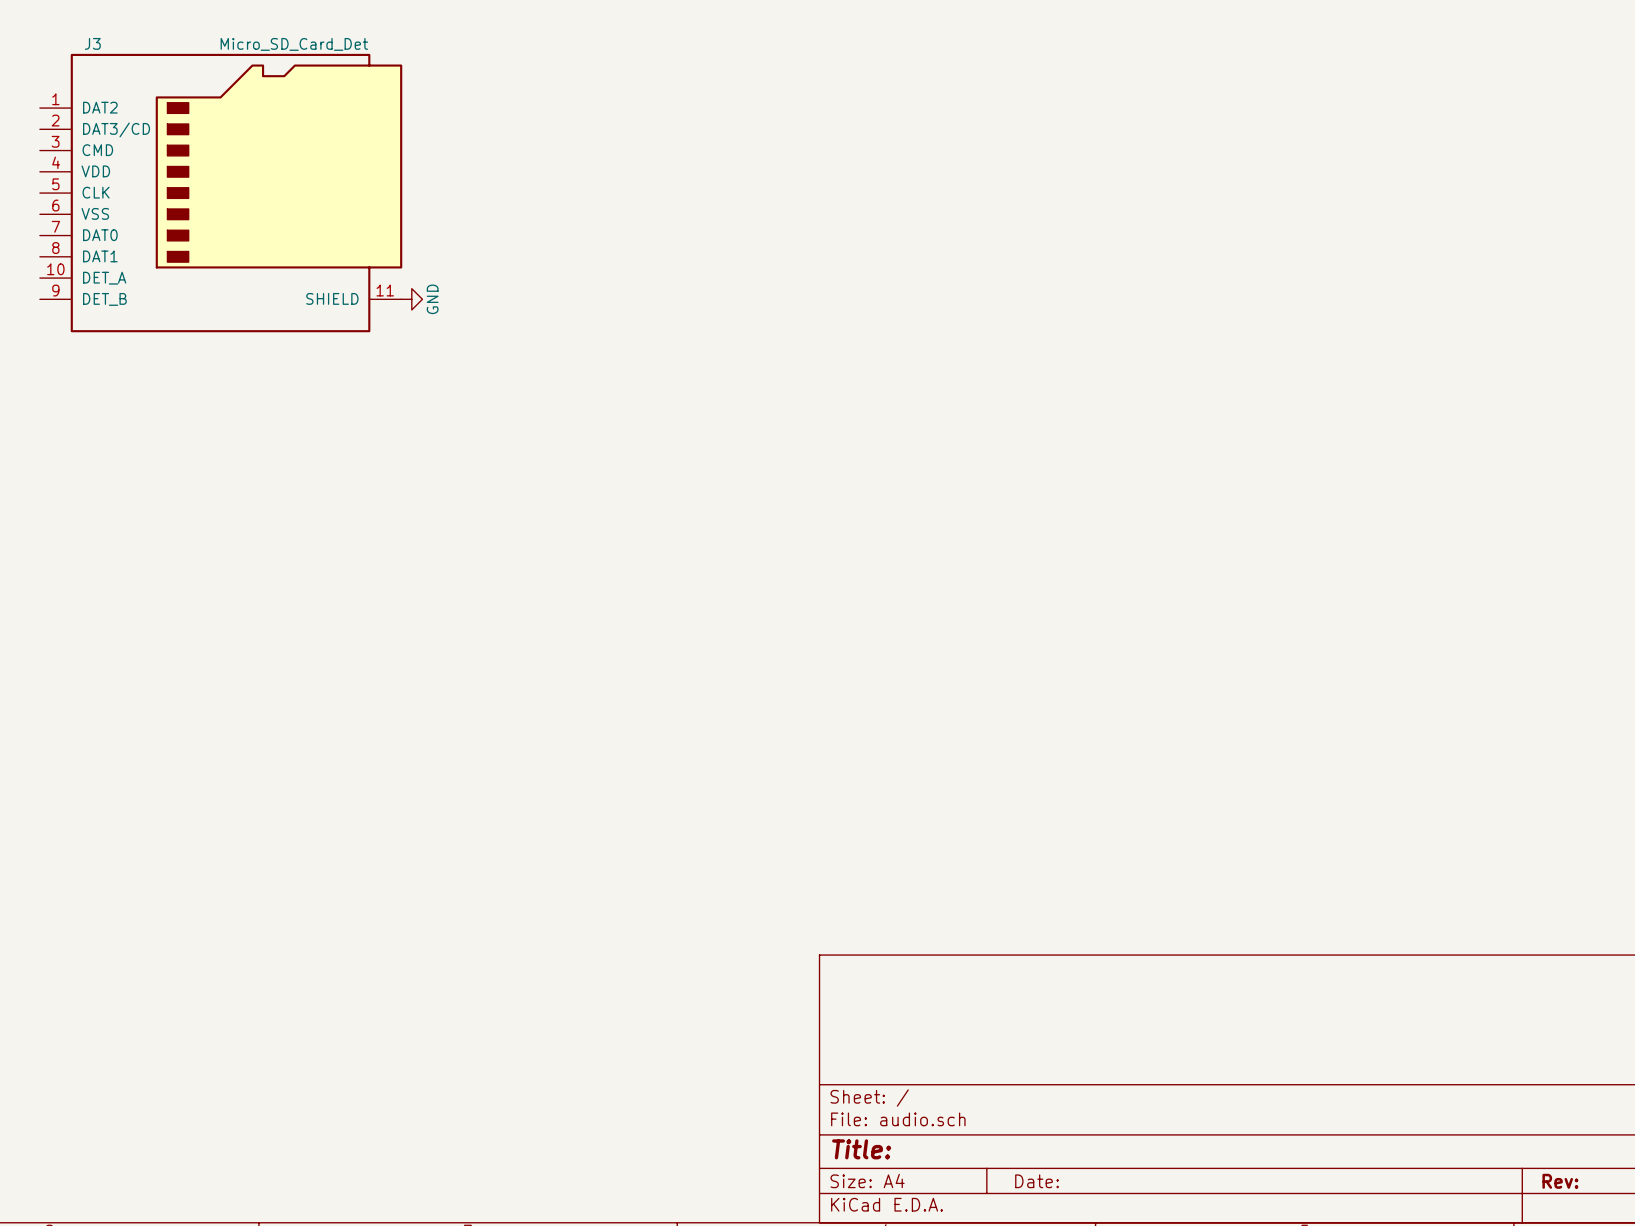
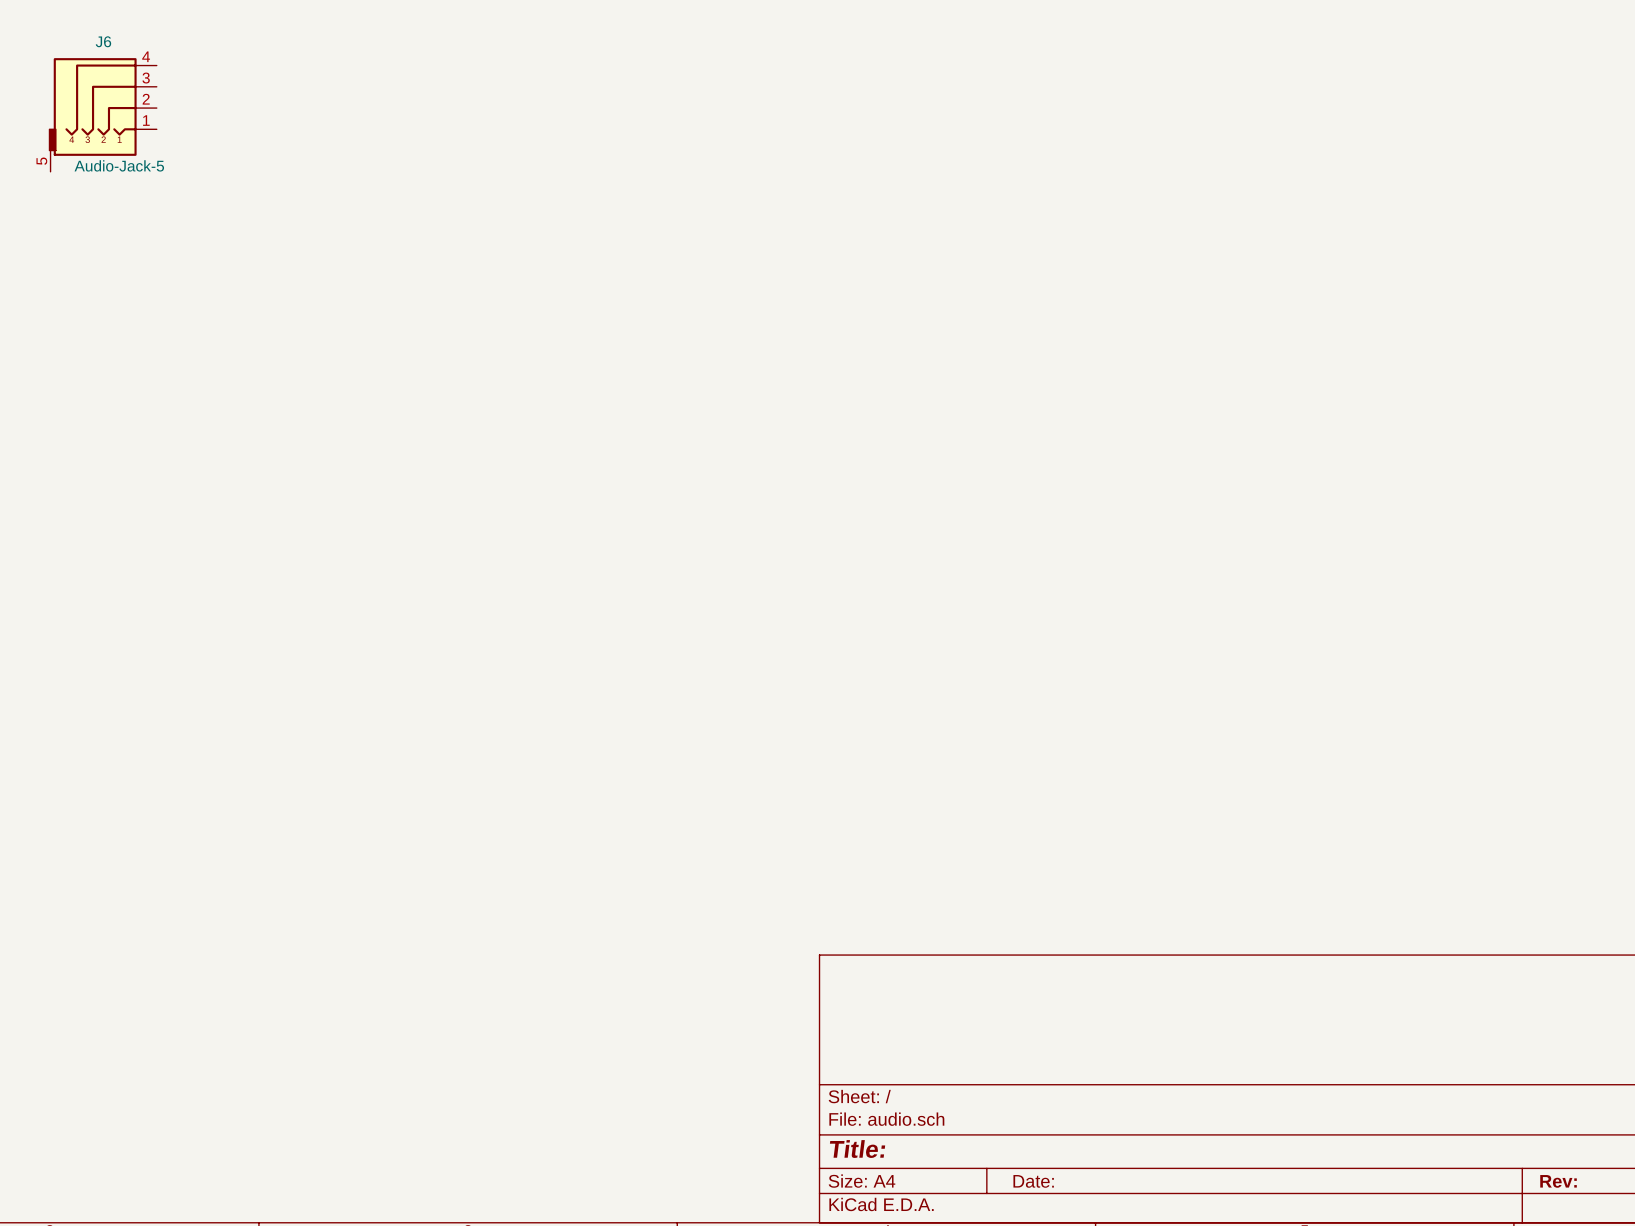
J6: none -> Audio-Jack-5 (103, 114)
J3: Micro_SD_Card_Det (221, 193) -> none
power symbol: GND (411, 299) -> none

